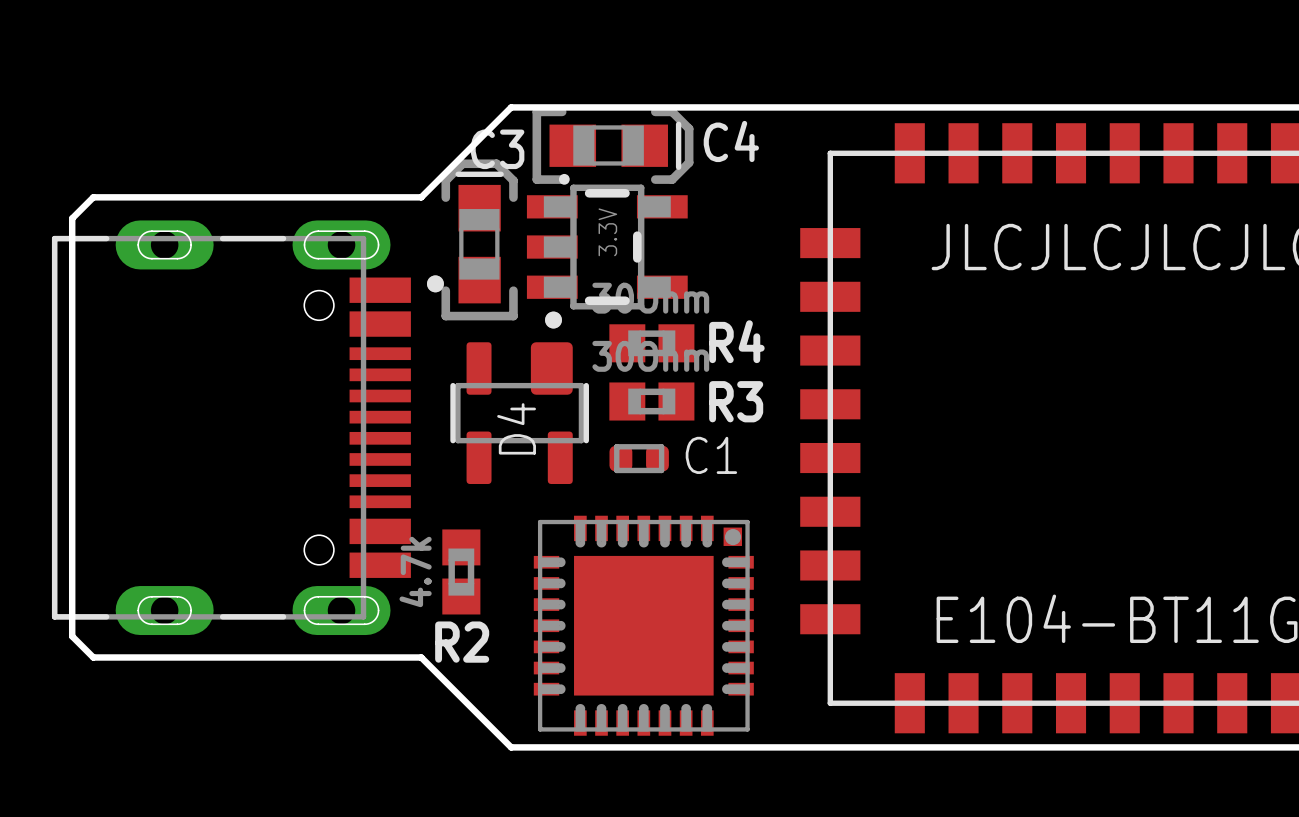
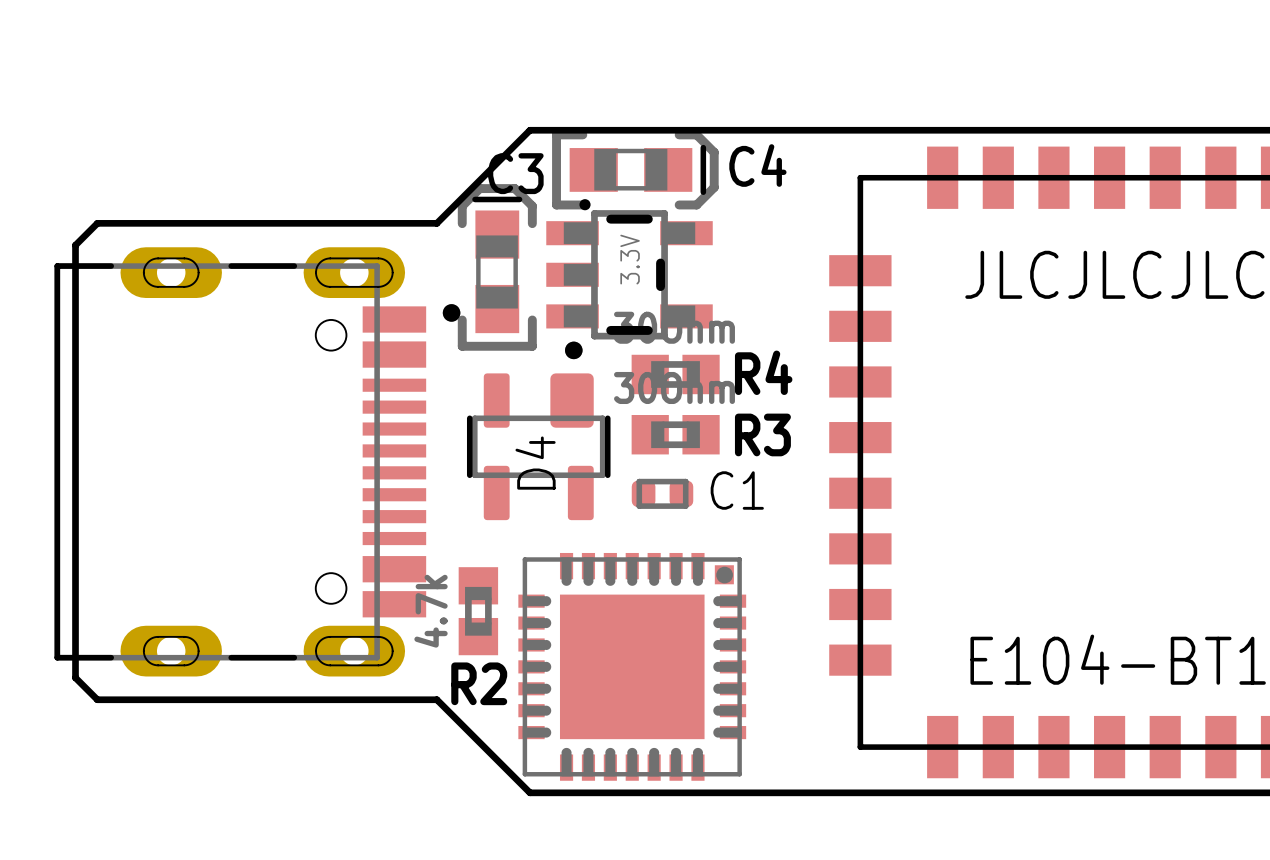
part position: (643, 625) -> (632, 666)

